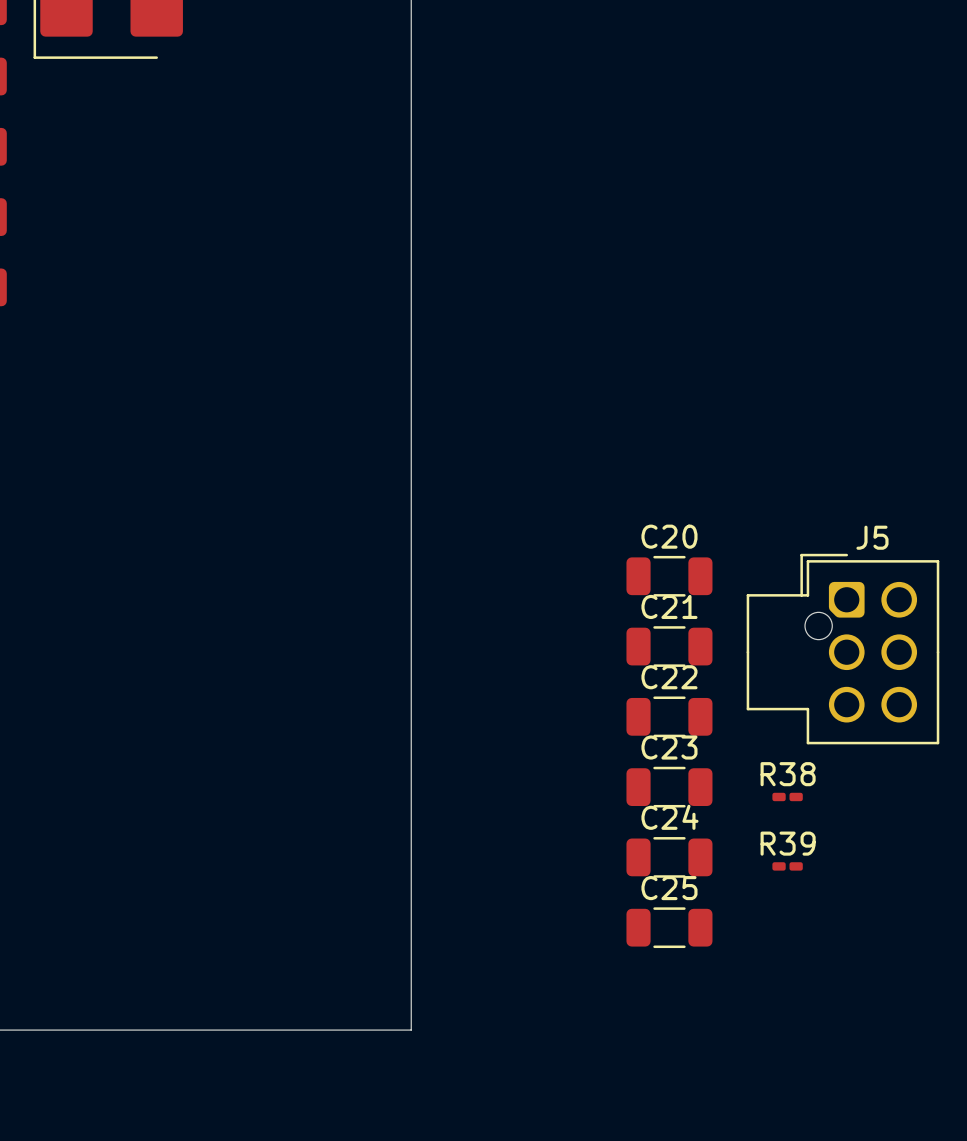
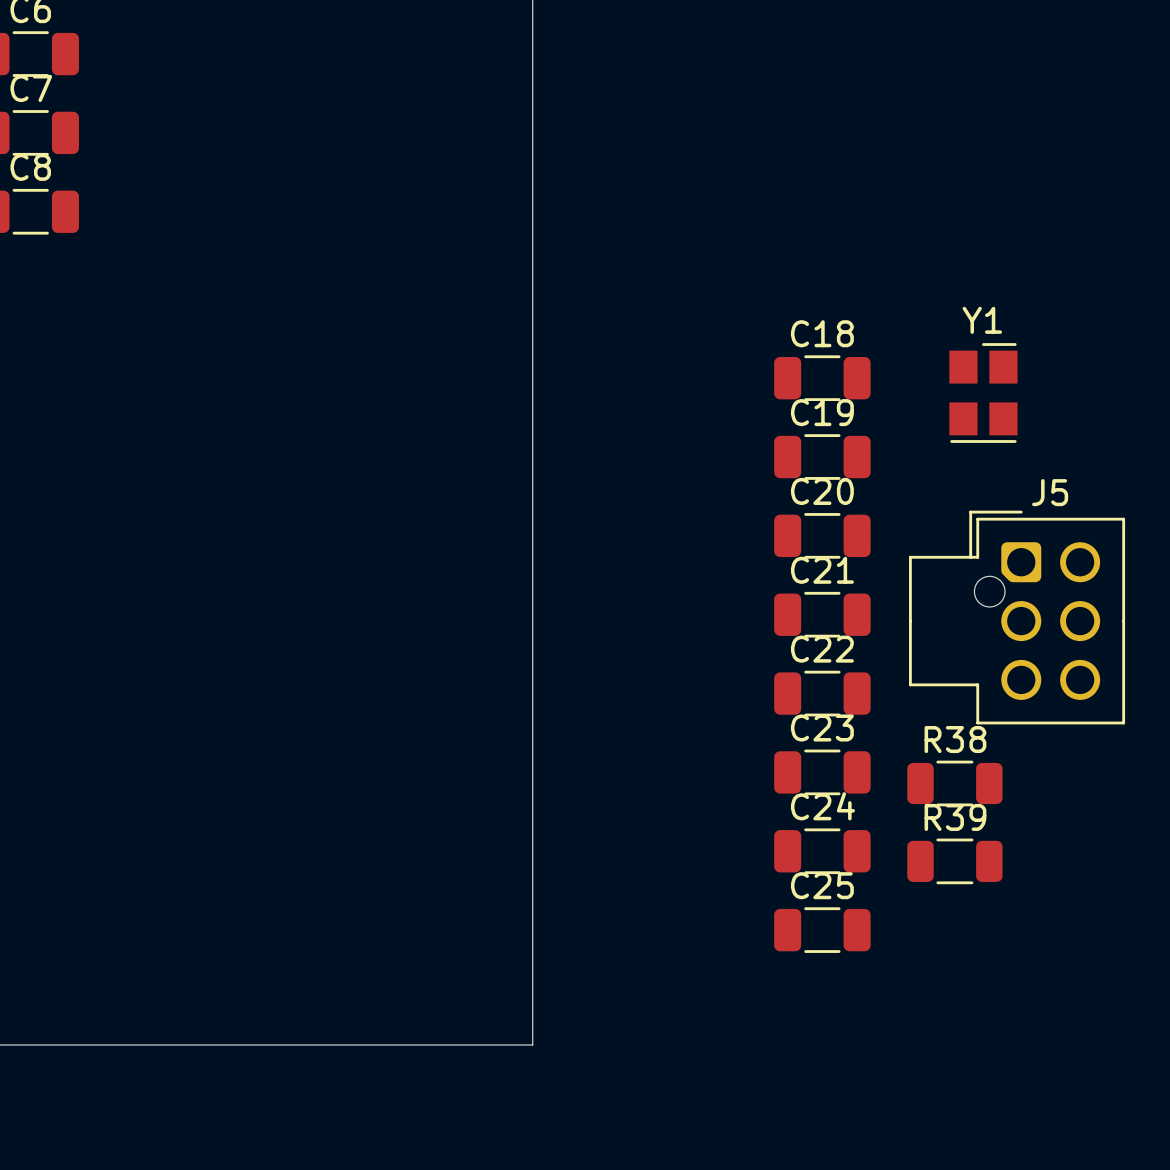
C18: none -> (822, 378)
Y1: none -> (983, 393)
C19: none -> (822, 457)
R38 footprint: [772, 792, 803, 802] -> [907, 760, 1003, 807]
R39 footprint: [772, 862, 803, 871] -> [907, 838, 1003, 885]

